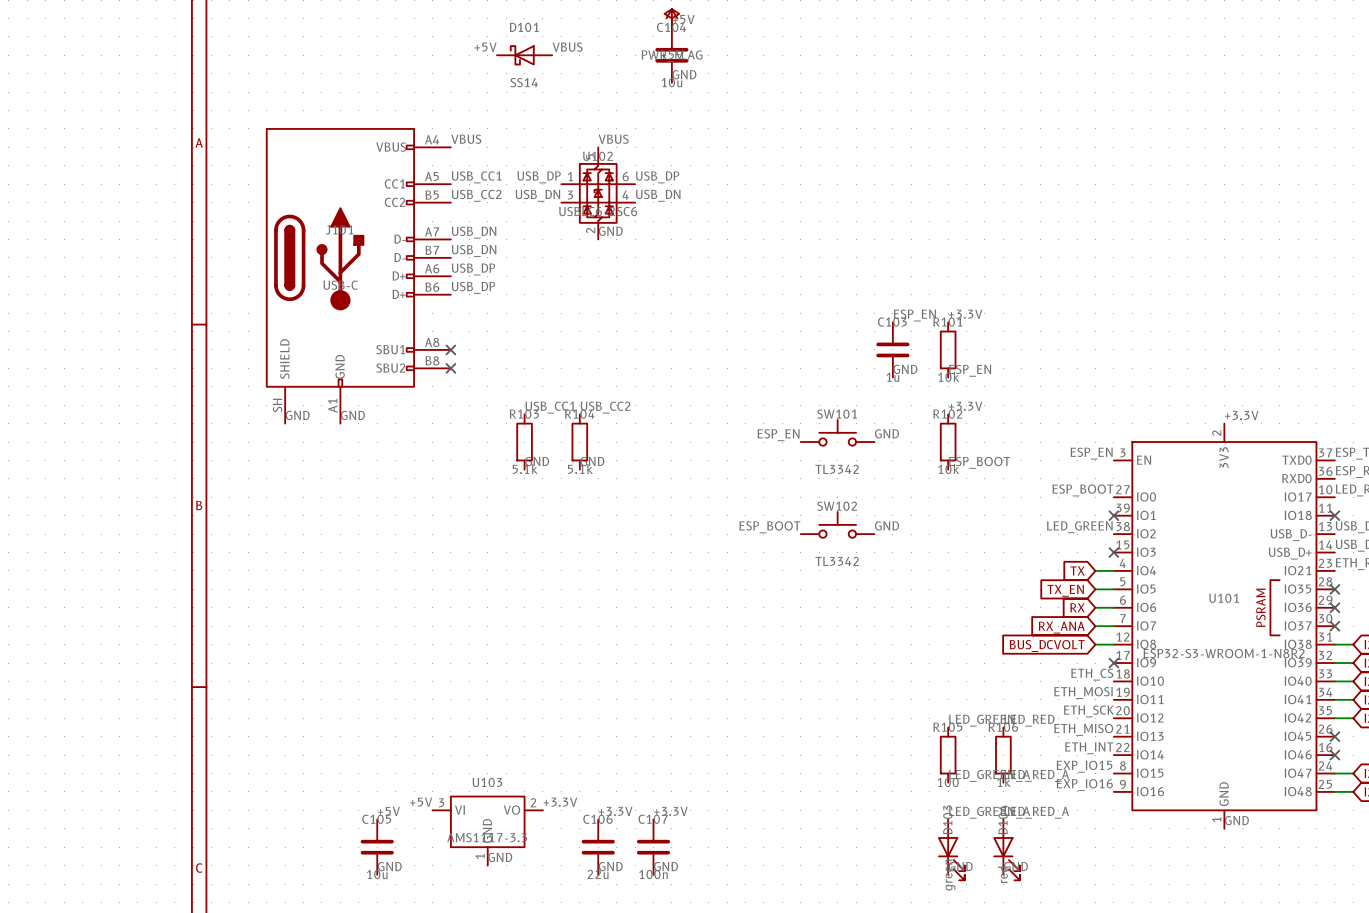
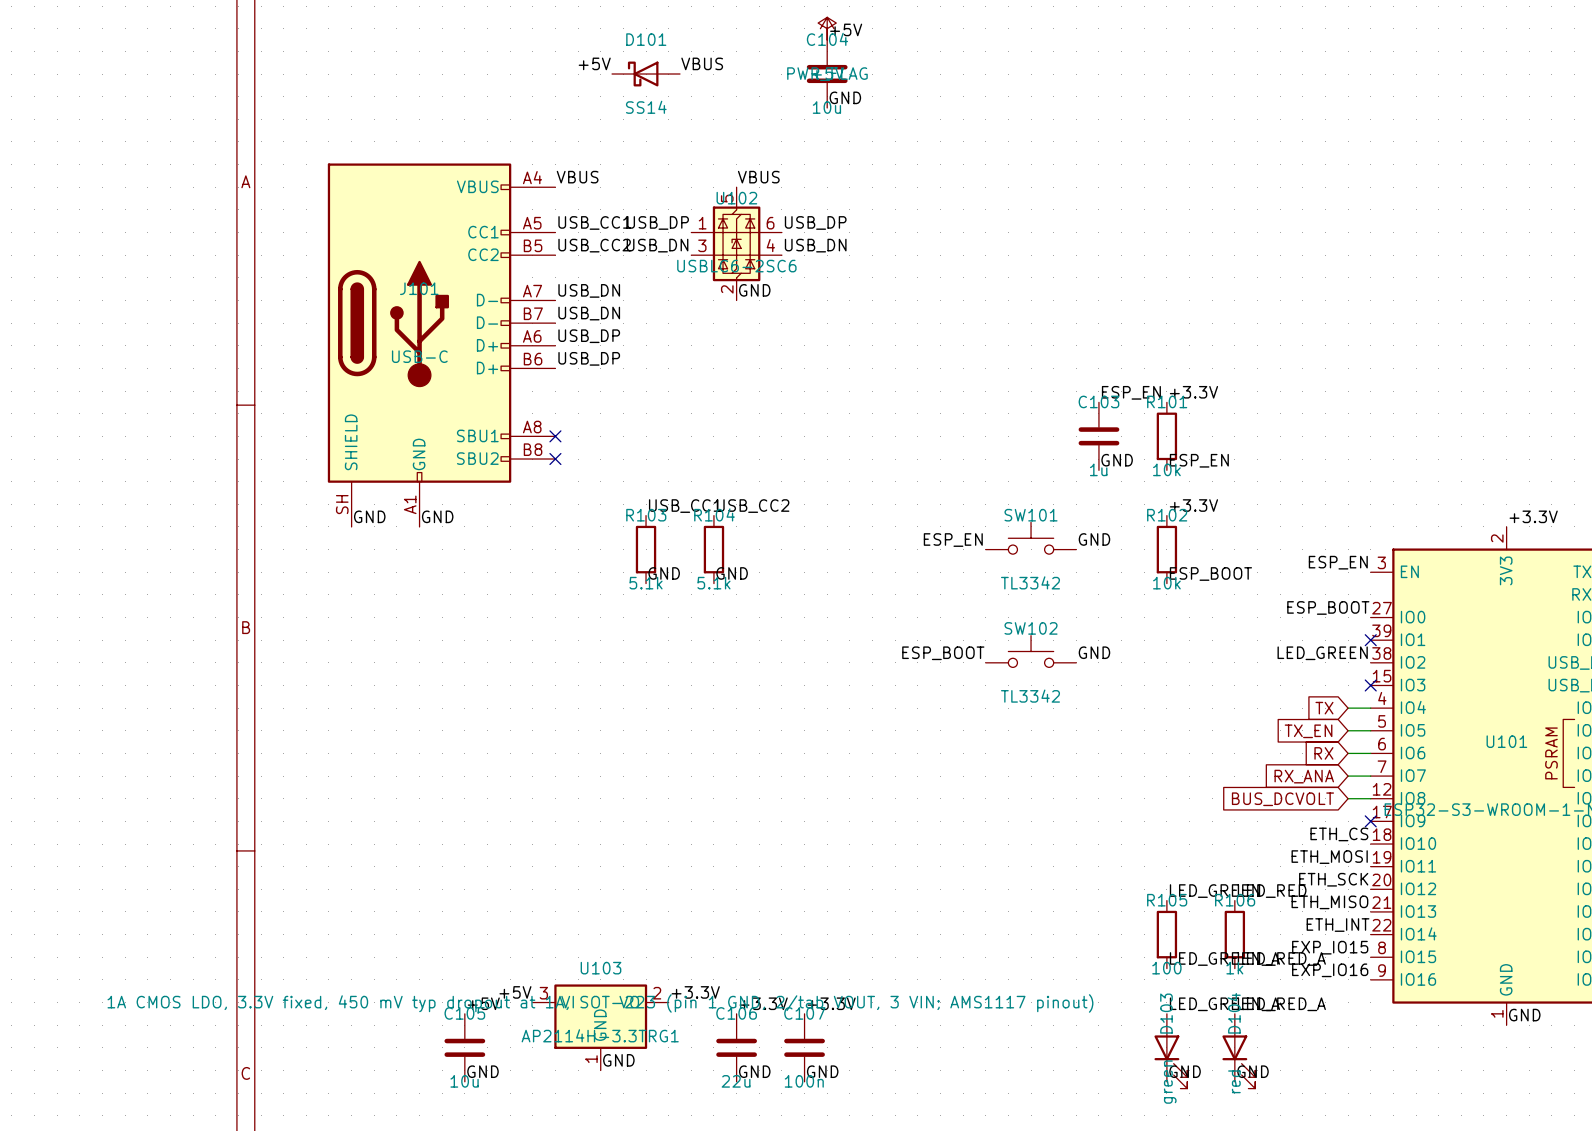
U103 text: none -> 1A CMOS LDO, 3.3V fixed, 450 mV typ dropout at 1A, SOT-223 (pin 1 GND, 2/tab VOUT, 3 VIN; AMS1117 pinout) (600, 1003)
U103 value: AMS1117-3.3 (487, 837) -> AP2114H-3.3TRG1 (600, 1035)

